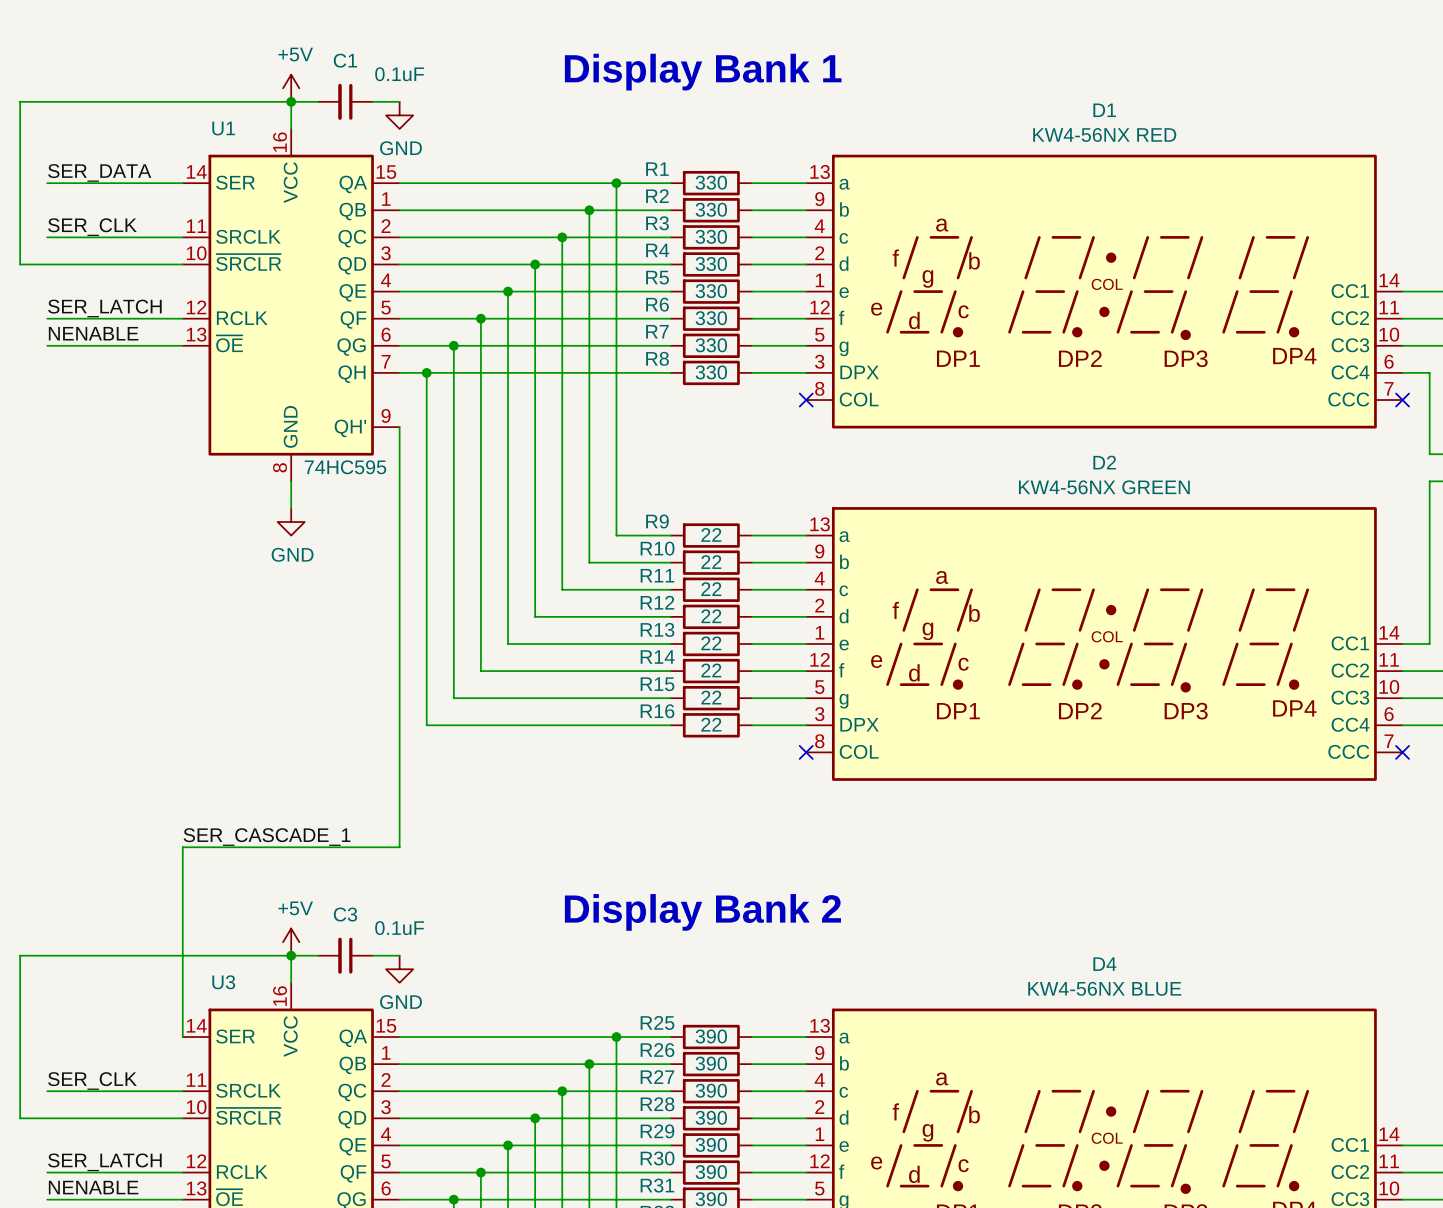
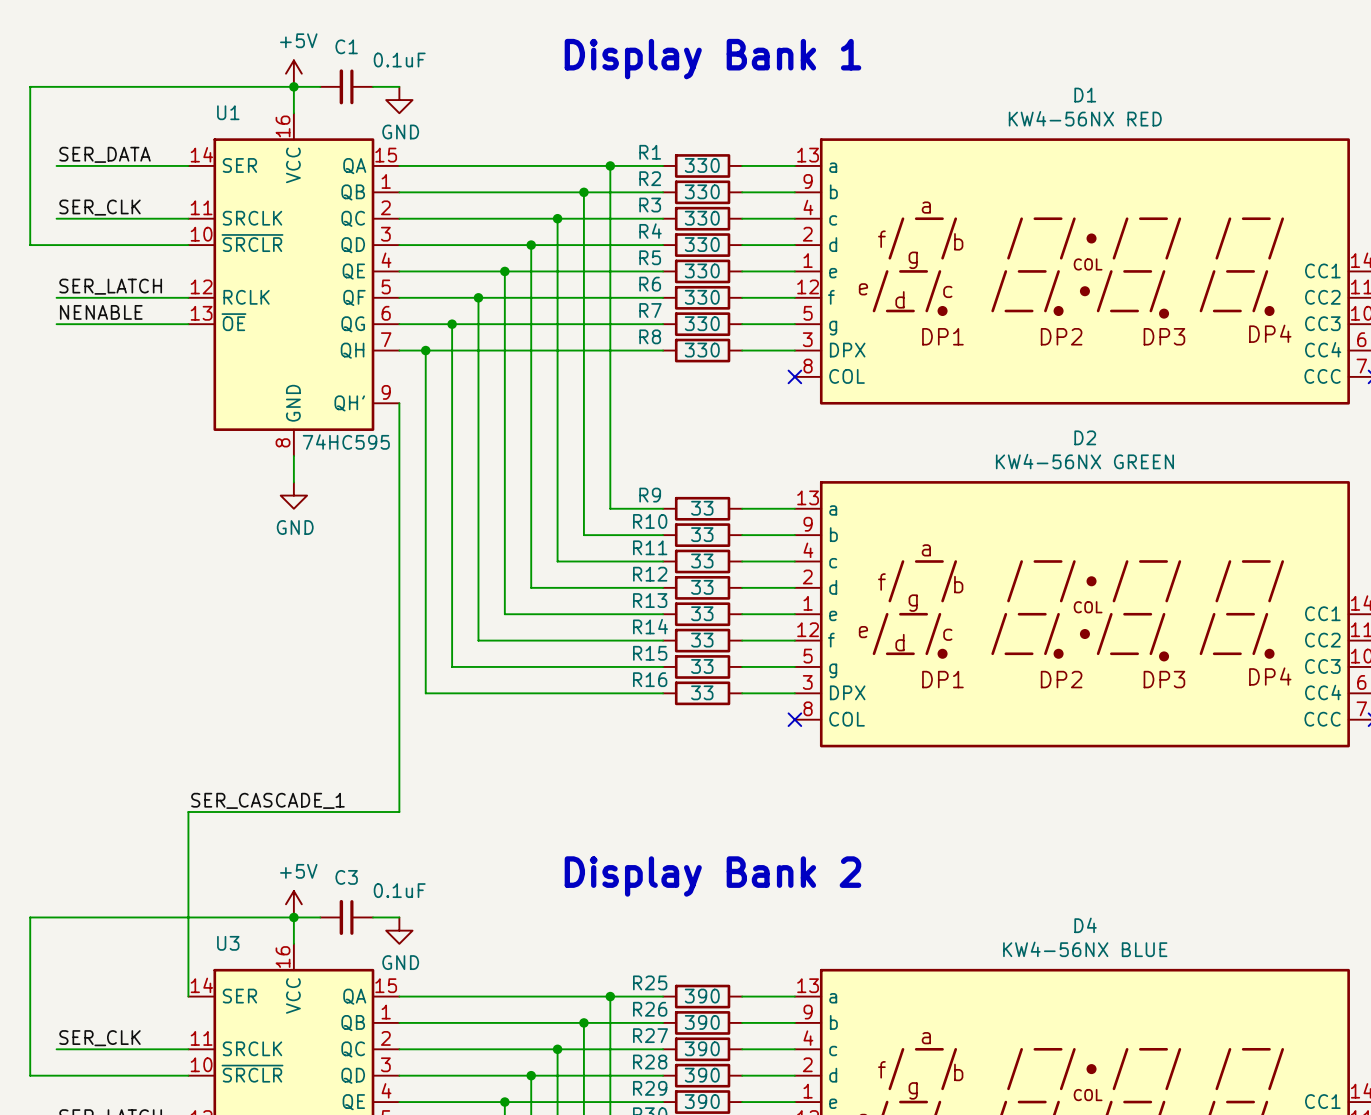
R9 value: 22 (711, 534) -> 33 (702, 508)
R10 value: 22 (711, 562) -> 33 (702, 534)
R11 value: 22 (711, 589) -> 33 (702, 561)
R12 value: 22 (711, 616) -> 33 (702, 587)
R13 value: 22 (711, 643) -> 33 (702, 613)
R14 value: 22 (711, 670) -> 33 (702, 640)
R15 value: 22 (711, 697) -> 33 (702, 666)
R16 value: 22 (711, 724) -> 33 (702, 692)

